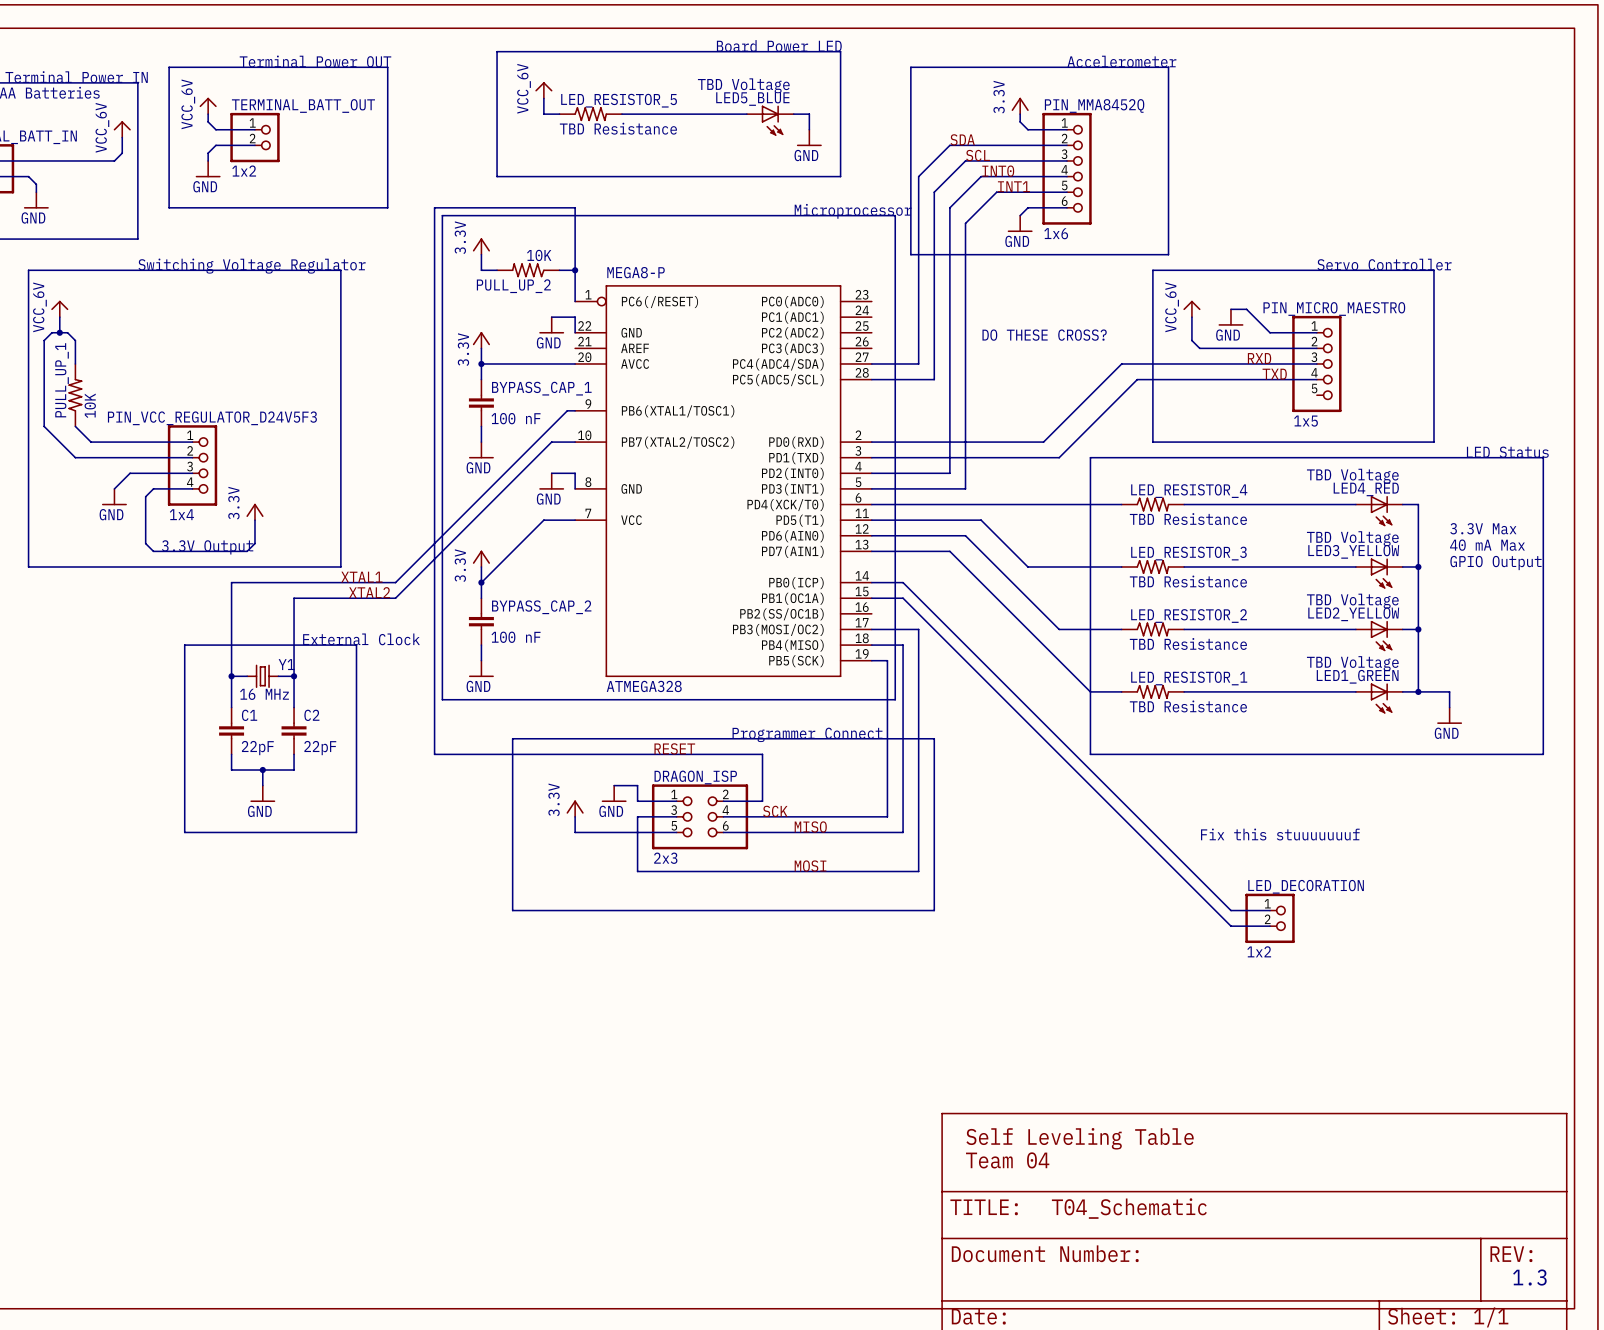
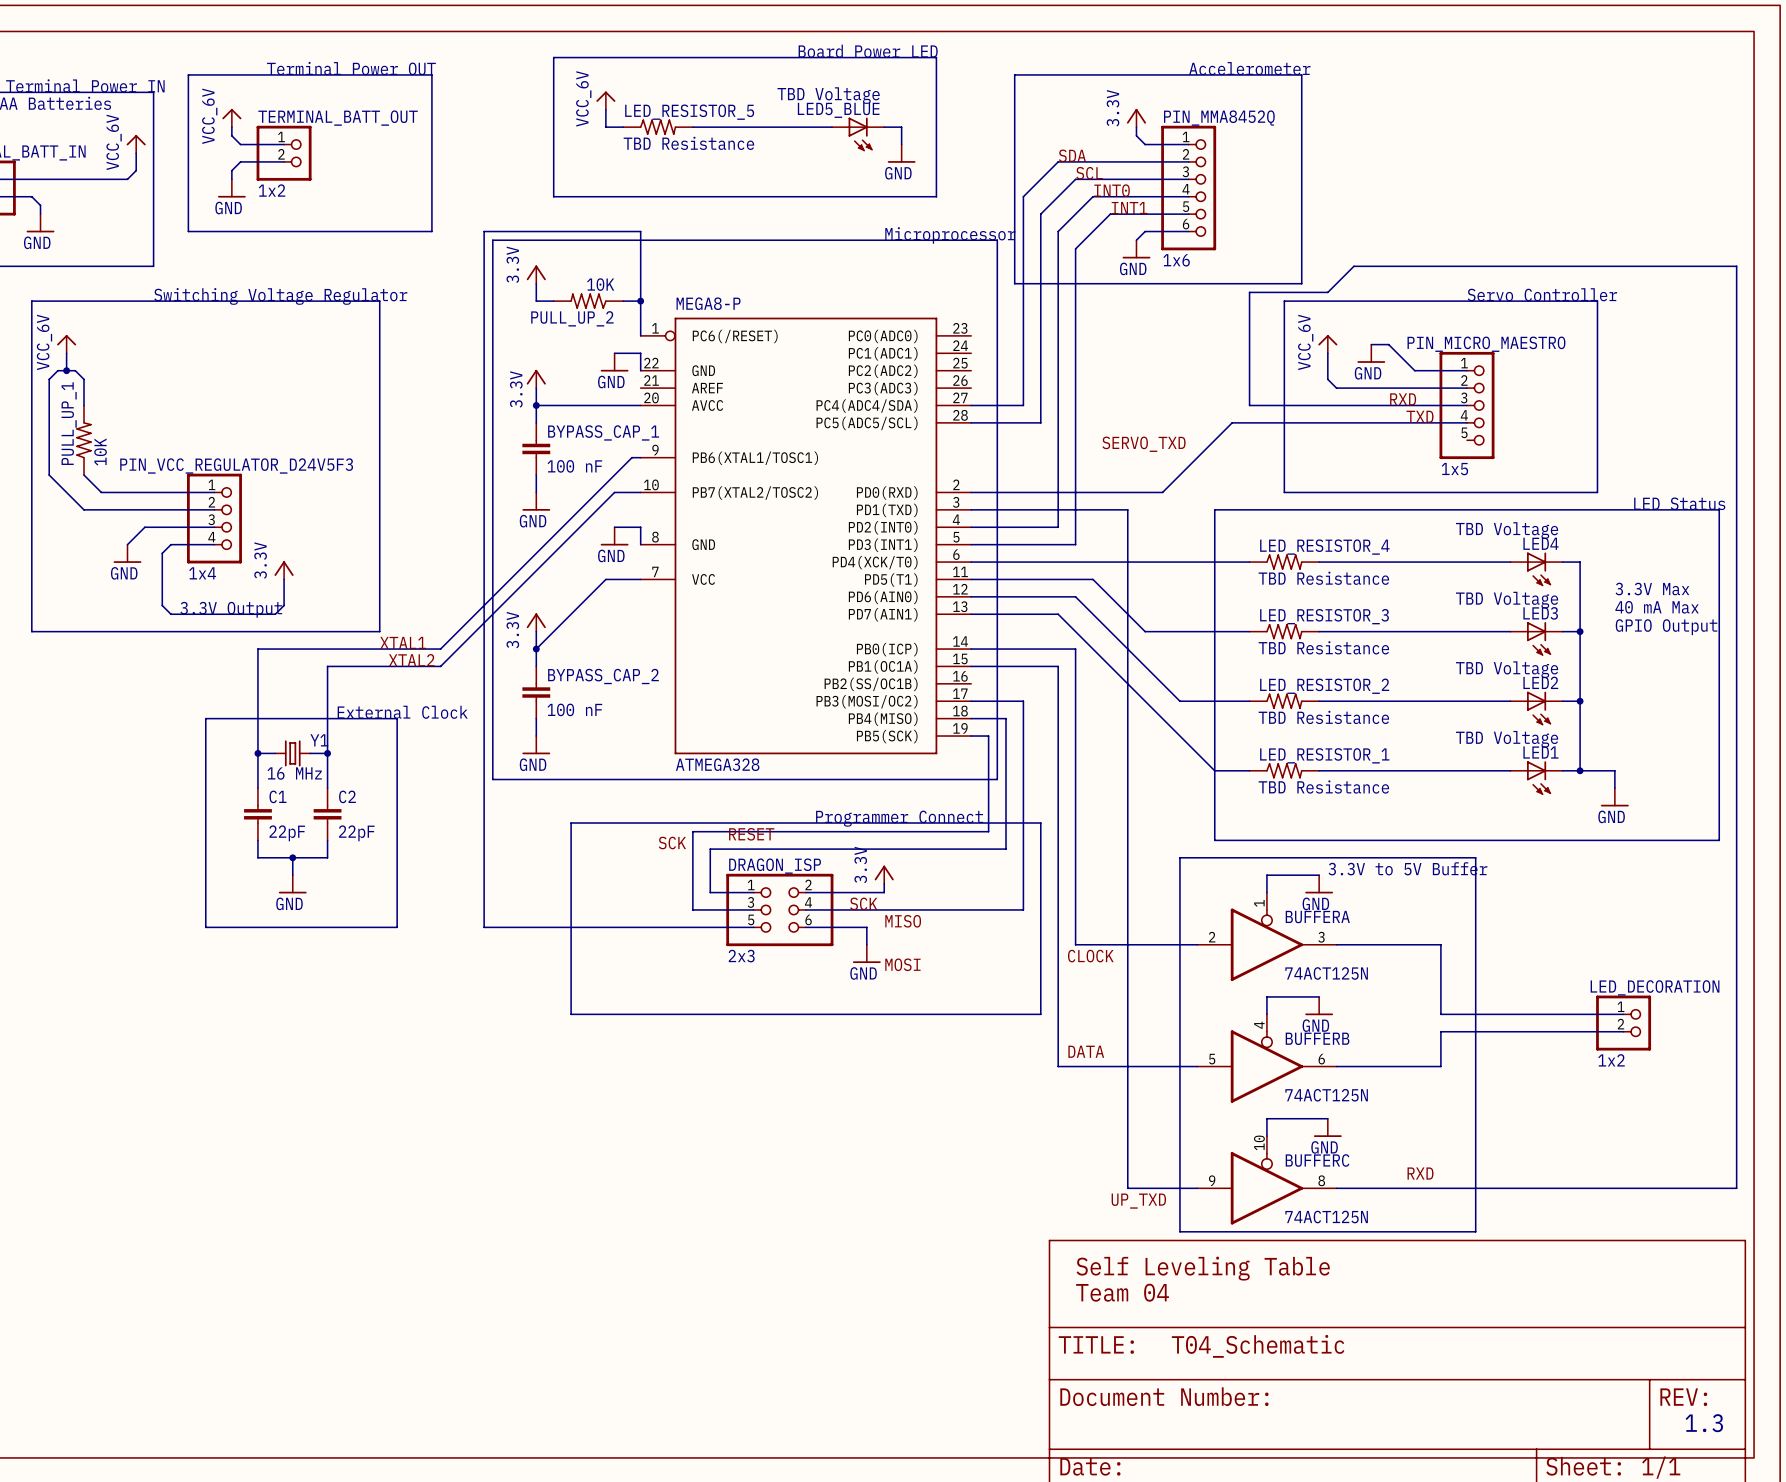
text: DO THESE CROSS? (1044, 335) -> none
wire: (1121, 363) (1106, 379) -> (1266, 422) (1232, 422)
wire: none -> (1249, 405) (1249, 292) (1327, 292) (1353, 266) (1736, 266) (1736, 1188) (1336, 1188)
wire: (1137, 379) (1059, 457) (1012, 457) -> (1197, 1188) (1127, 1188) (1127, 509)
label: none -> SERVO_TXD (1143, 444)
LED4_RED name: LED4_RED (1366, 489) -> LED4 (1541, 543)
LED3_YELLOW name: LED3_YELLOW (1353, 551) -> LED3 (1540, 613)
wire: (903, 582) (1230, 910) (1270, 910) -> (1006, 649) (1075, 649) (1075, 944) (1197, 944)
wire: (903, 598) (1230, 926) (1270, 926) -> (1006, 666) (1058, 666) (1058, 1066) (1197, 1066)
LED2_YELLOW name: LED2_YELLOW (1353, 614) -> LED2 (1540, 682)
LED1_GREEN name: LED1_GREEN (1357, 676) -> LED1 (1540, 752)
wire: (887, 746) (887, 816) -> (1023, 909) (988, 909)
wire: (434, 754) (762, 754) (762, 801) -> (884, 883) (884, 892) (849, 892)
label: none -> SCK (672, 843)
wire: (903, 762) (903, 832) (778, 832) -> (1006, 849) (710, 849) (710, 875)
line: none -> (1179, 857) (1179, 1231) (1475, 1231) (1475, 857) (1179, 857)
text: none -> 3.3V to 5V Buffer (1407, 868)
wire: (614, 785) (637, 785) -> none
power symbol: none -> 3.3V (884, 874)
wire: none -> (1319, 875) (1266, 875) (1266, 892)
power symbol: GND (614, 793) -> none
power symbol: none -> GND (1319, 884)
power symbol: 3.3V (575, 808) -> none
wire: (575, 816) (575, 832) -> (484, 840) (484, 927) (640, 927)
wire: (637, 816) (637, 871) (918, 871) (918, 816) -> (710, 909) (692, 909) (692, 831) (988, 831)
wire: none -> (866, 927) (866, 944)
text: Fix this stuuuuuuuf (1280, 834) -> none
BUFFERA: none -> 74ACT125N (1266, 936)
wire: none -> (1336, 944) (1440, 944) (1440, 1014) (1623, 1014)
power symbol: none -> GND (866, 953)
label: none -> CLOCK (1090, 956)
wire: none -> (1319, 996) (1266, 996) (1266, 1014)
power symbol: none -> GND (1319, 1006)
LED_DECORATION: 1x2 (1270, 918) -> none
LED_DECORATION: none -> 1x2 (1623, 1023)
wire: none -> (1623, 1031) (1440, 1031) (1440, 1066) (1336, 1066)
label: none -> DATA (1086, 1051)
BUFFERB: none -> 74ACT125N (1266, 1058)
wire: none -> (1327, 1118) (1266, 1118) (1266, 1136)
power symbol: none -> GND (1327, 1127)
label: none -> RXD (1420, 1173)
BUFFERC: none -> 74ACT125N (1266, 1180)
label: none -> UP_TXD (1138, 1201)

